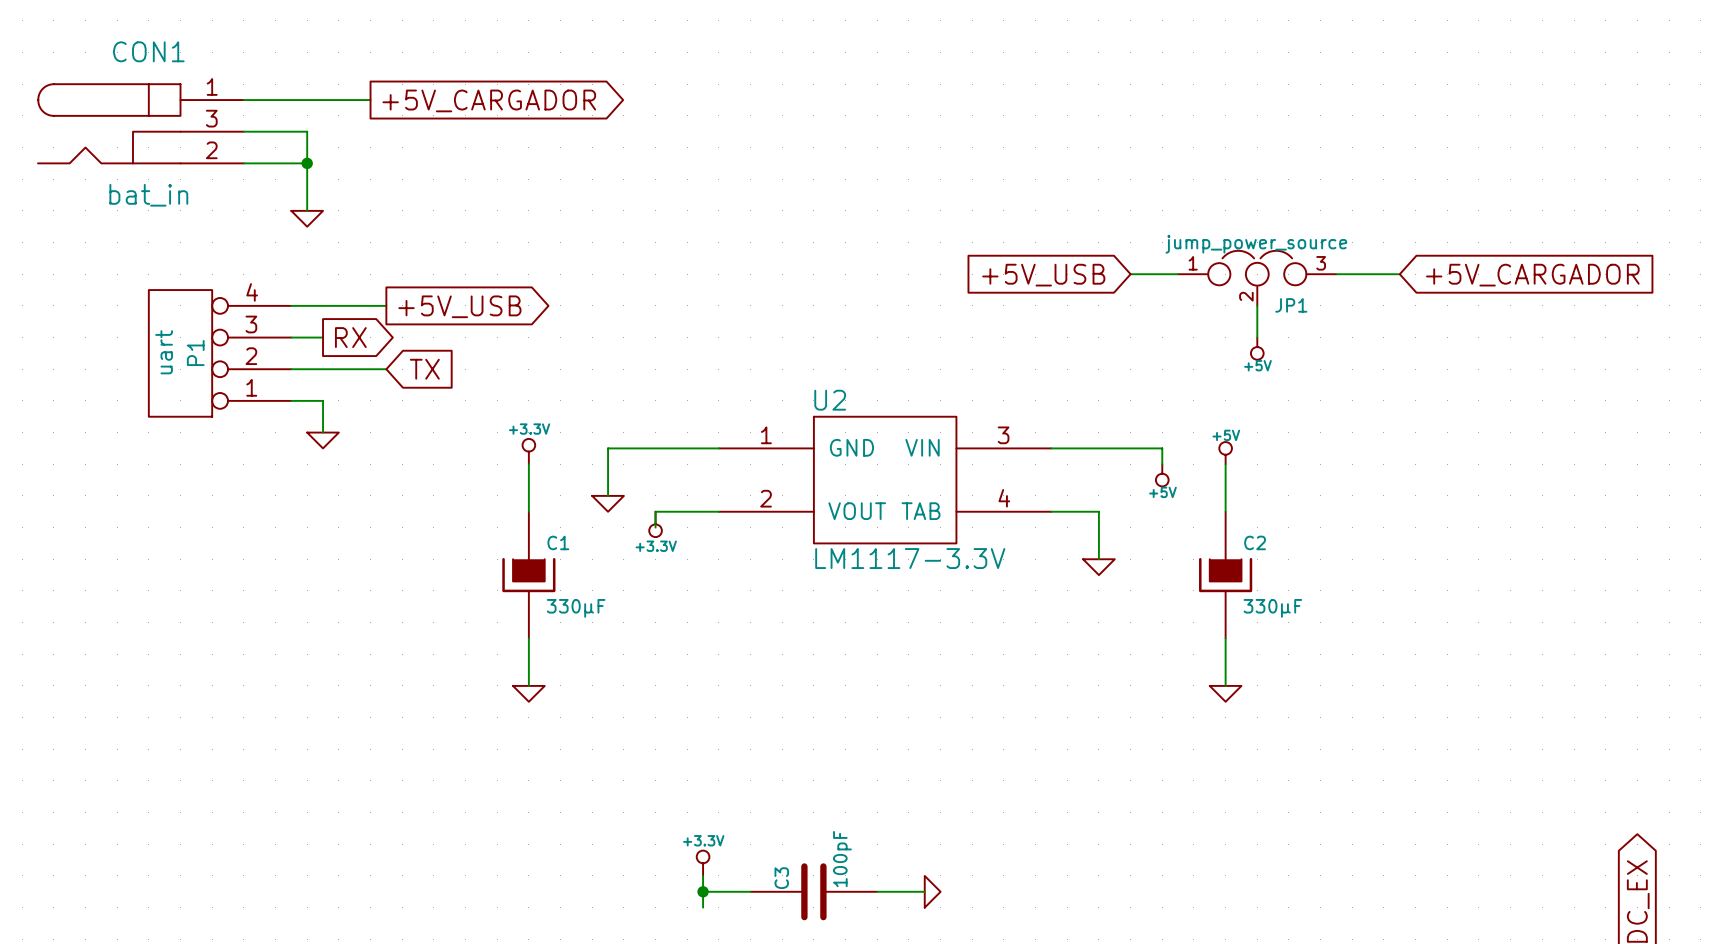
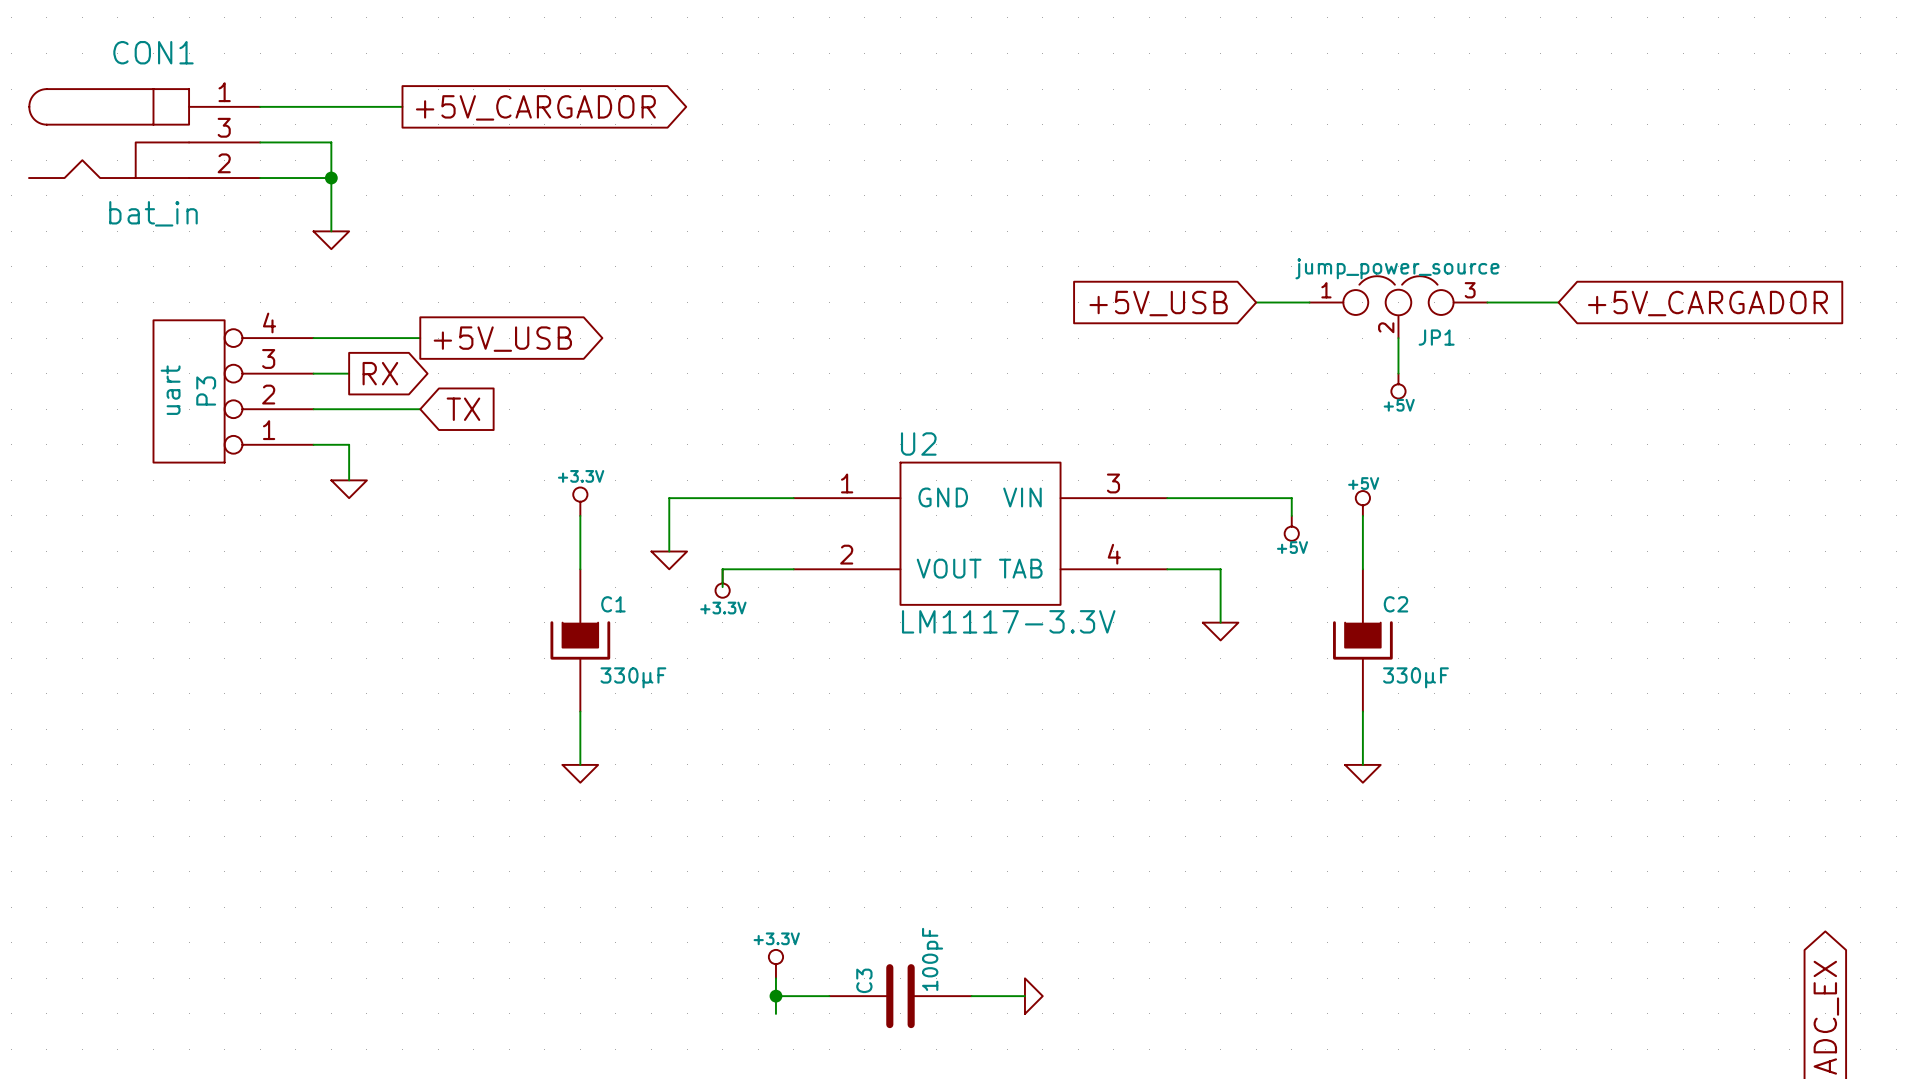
P1 name: P1 (195, 353) -> P3 (206, 391)

